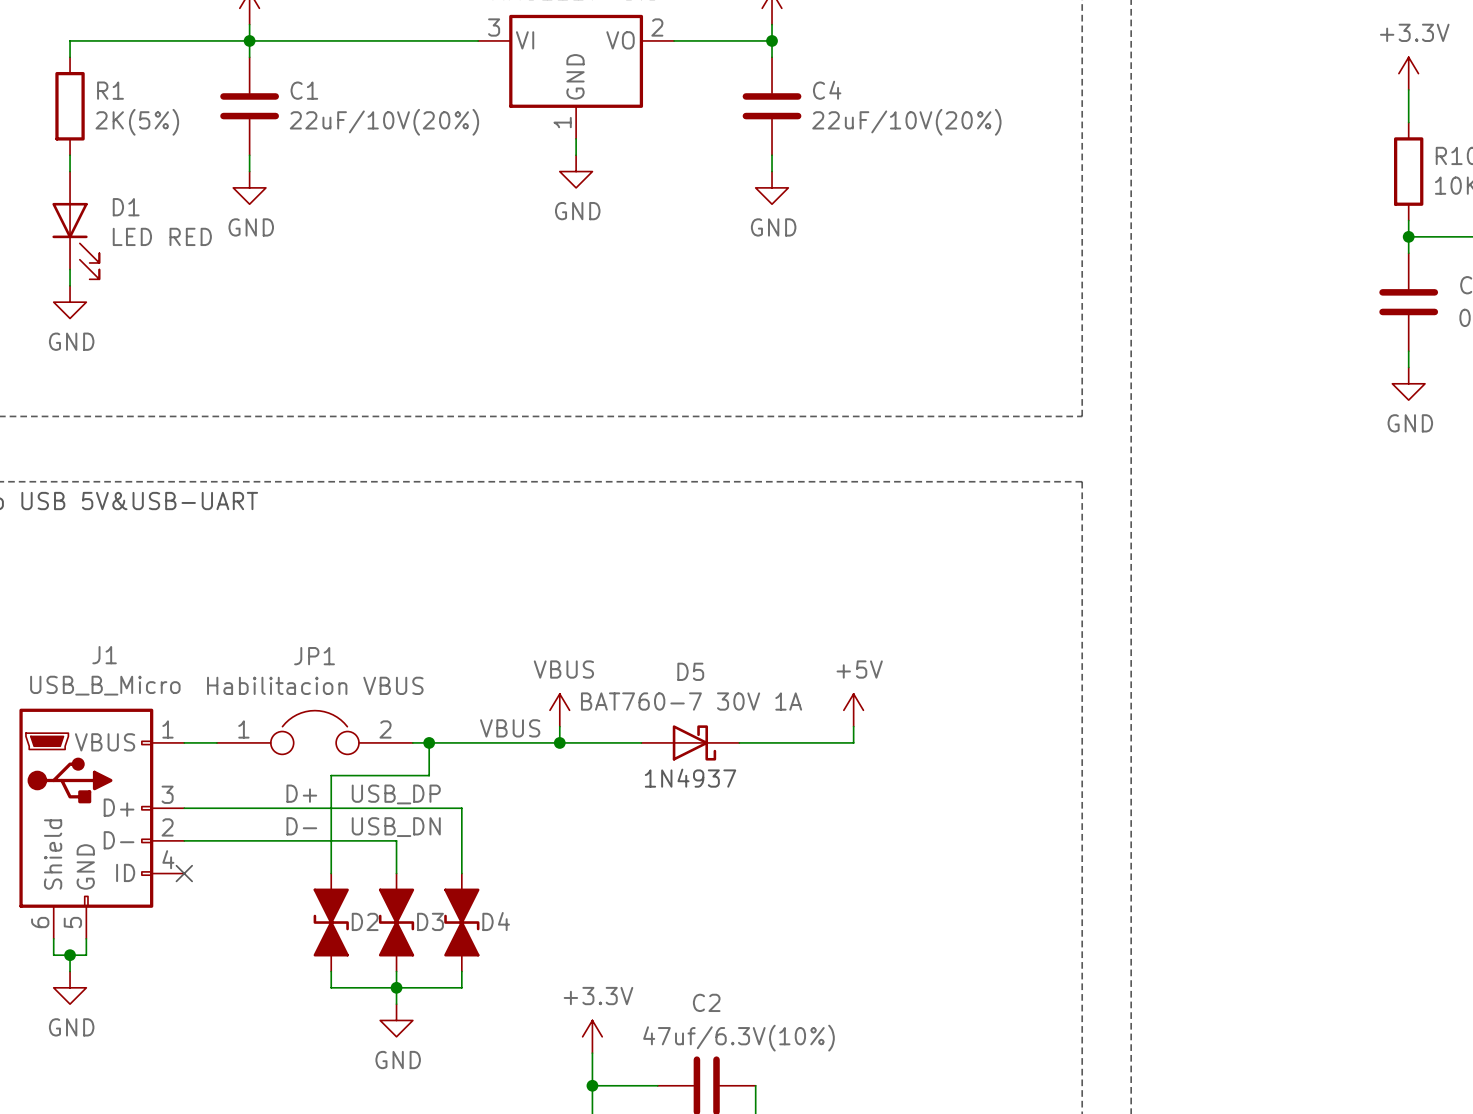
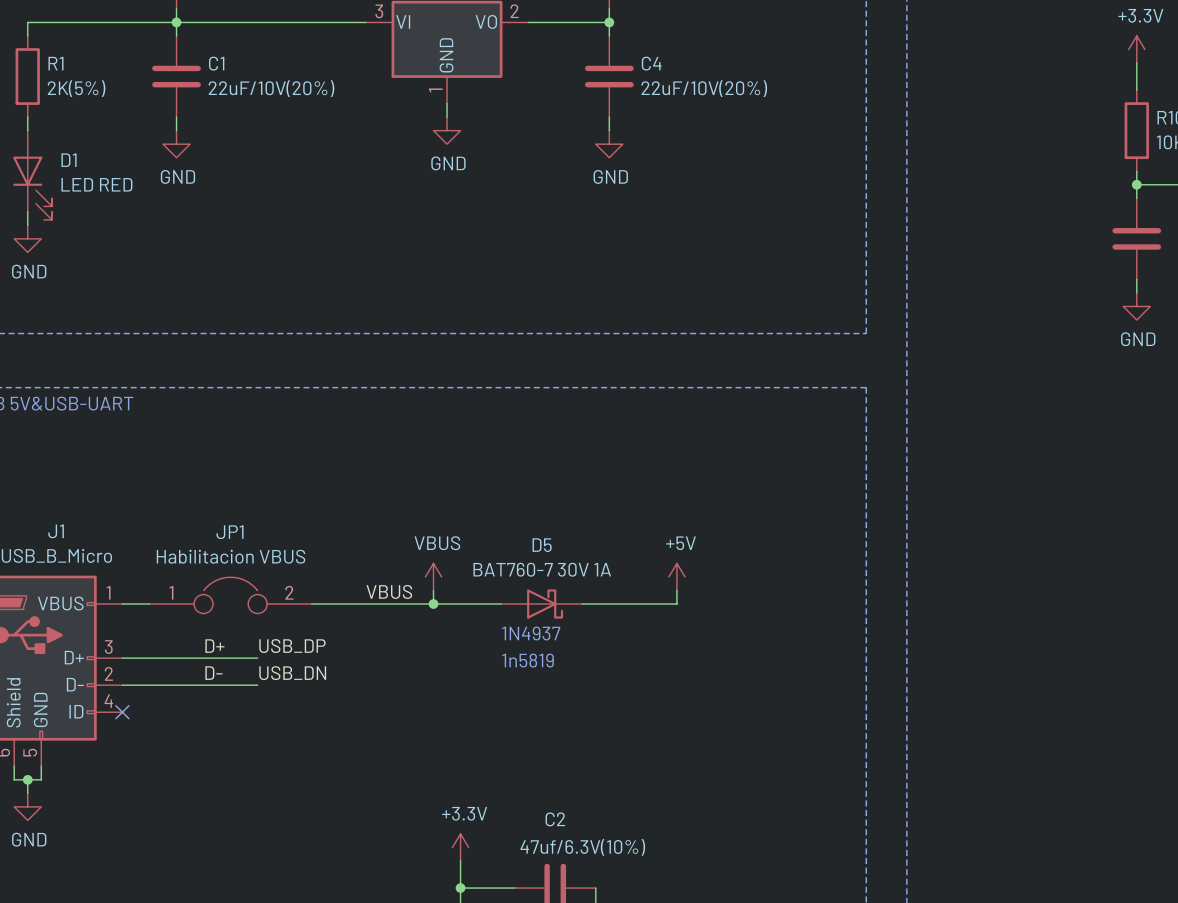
wire: (429, 742) (429, 775) (331, 775) (331, 873) -> none
junction: (429, 742) -> none
wire: (347, 808) (461, 808) (461, 873) -> none
text: none -> 1n5819 (528, 660)
wire: (347, 840) (396, 840) (396, 873) -> none
D2: (331, 922) -> none
D3: (396, 922) -> none
D4: (461, 922) -> none
wire: (331, 971) (331, 987) (461, 987) (461, 971) -> none
wire: (396, 971) (396, 1004) -> none
junction: (396, 987) -> none
power symbol: GND (396, 1020) -> none

